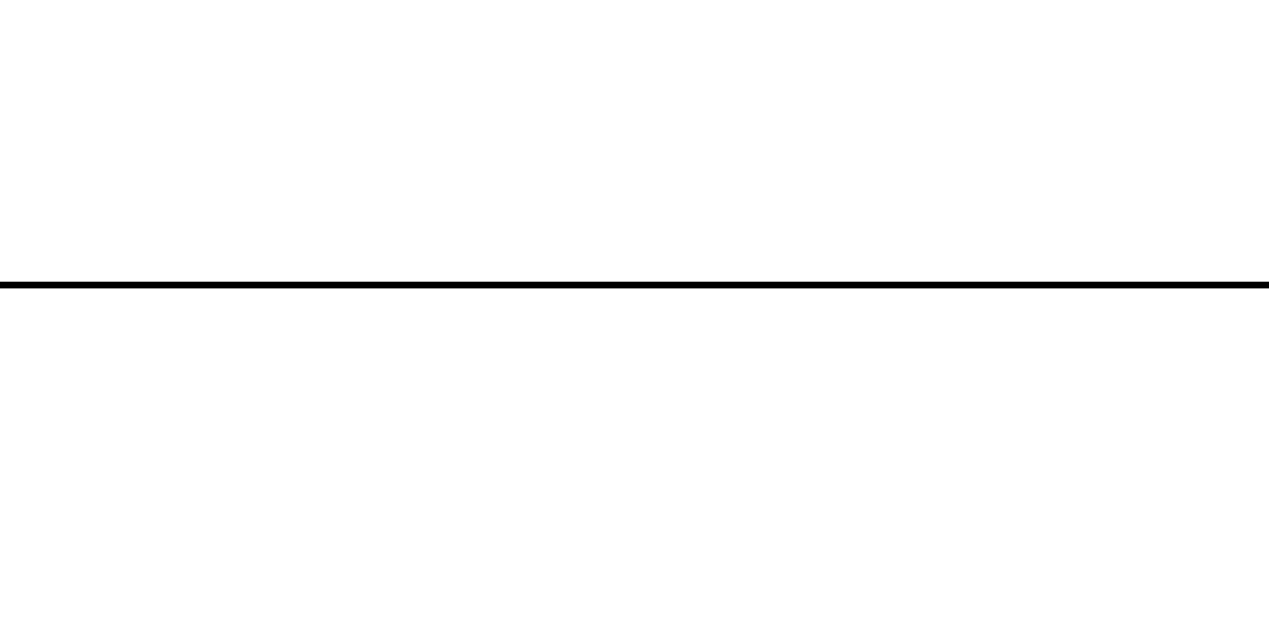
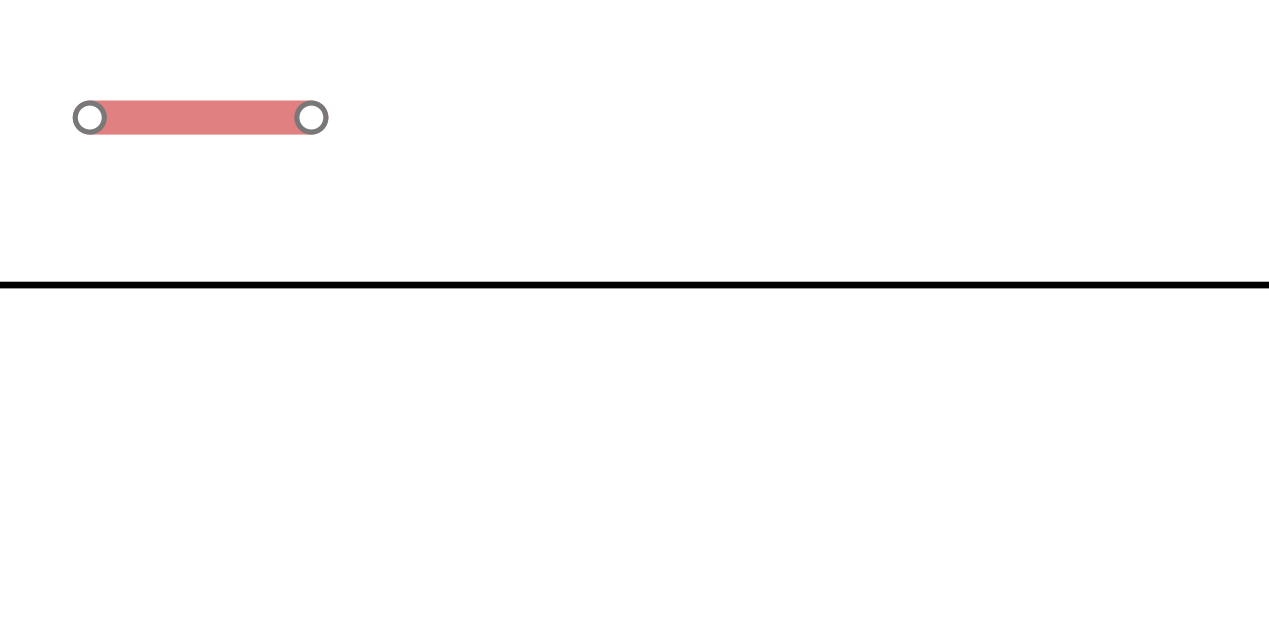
track: none -> (89, 117) (311, 117)
via: none -> (89, 117)
via: none -> (311, 117)

